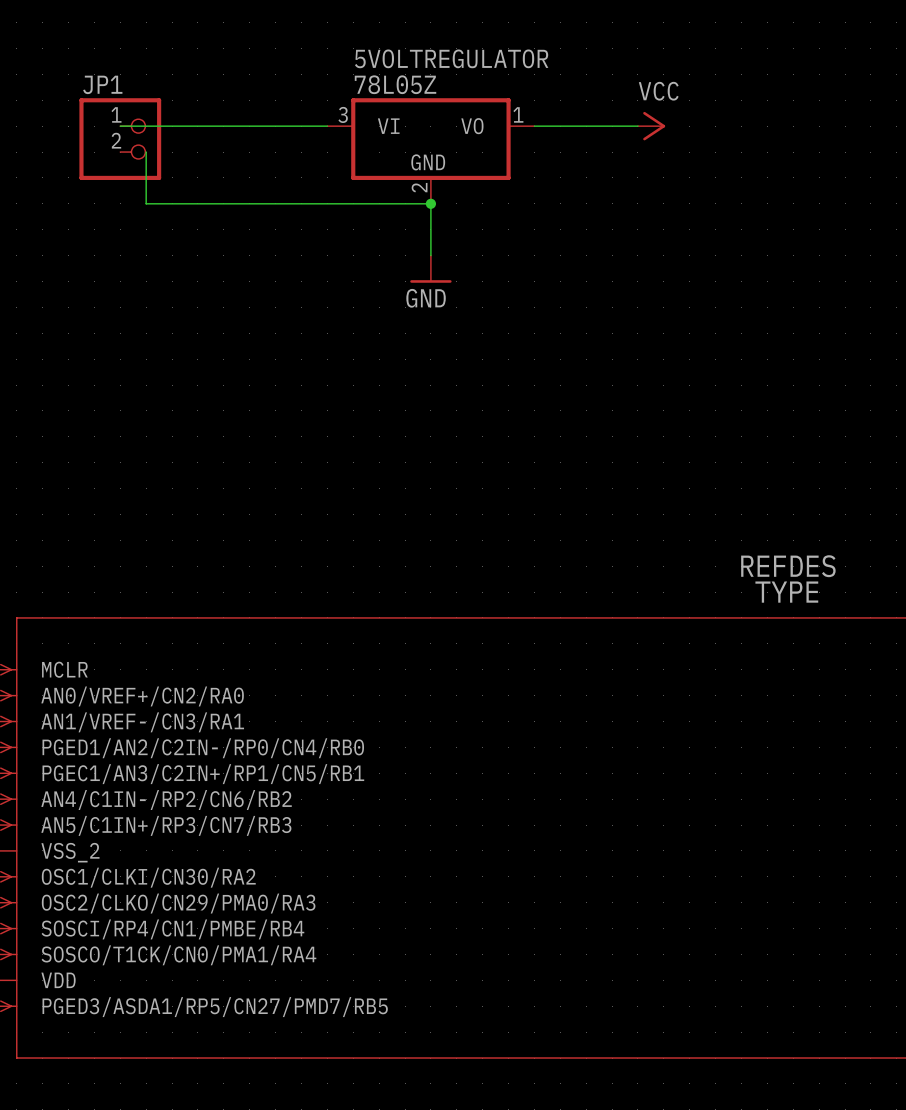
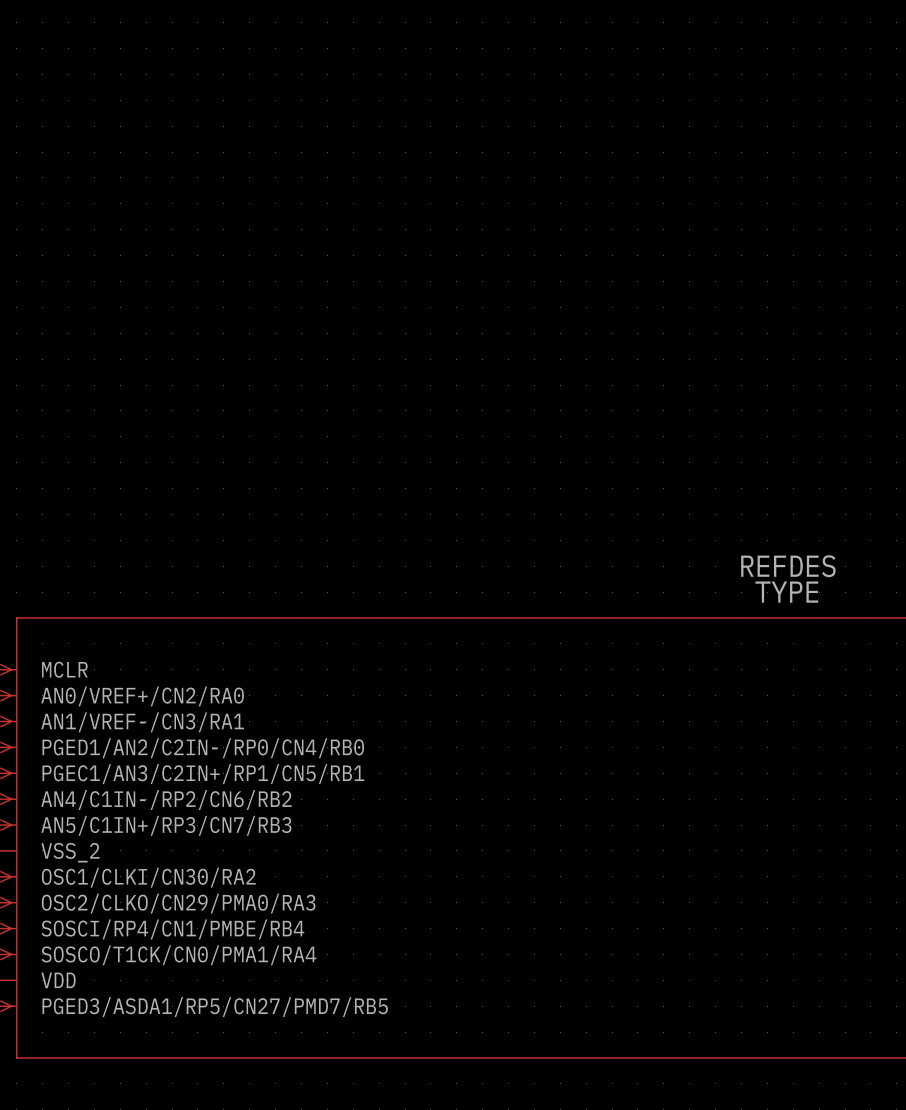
wire: (120, 126) (327, 126) -> none
wire: (534, 126) (637, 126) -> none
power symbol: VCC (651, 126) -> none
JP1: (120, 139) -> none
5VOLTREGULATOR: 78L05Z (430, 151) -> none
wire: (146, 152) (146, 203) (430, 203) (430, 255) -> none
junction: (430, 203) -> none
power symbol: GND (430, 269) -> none

